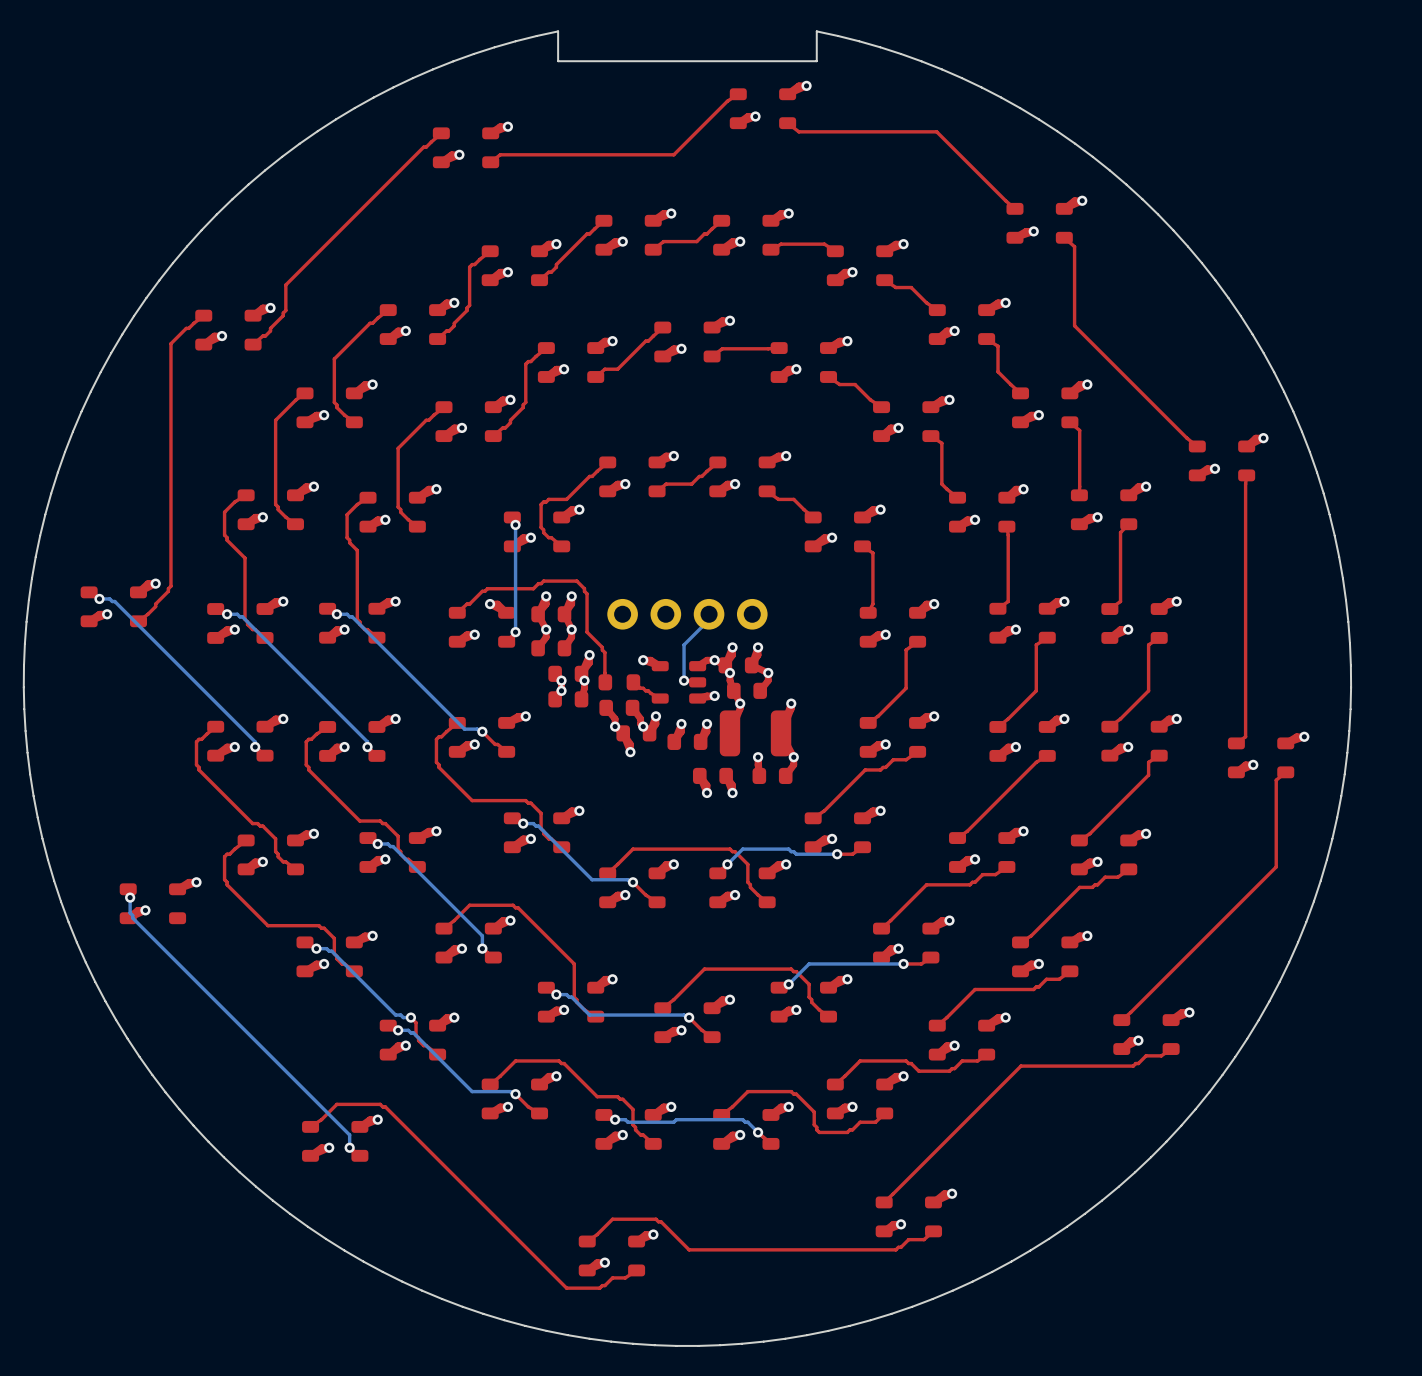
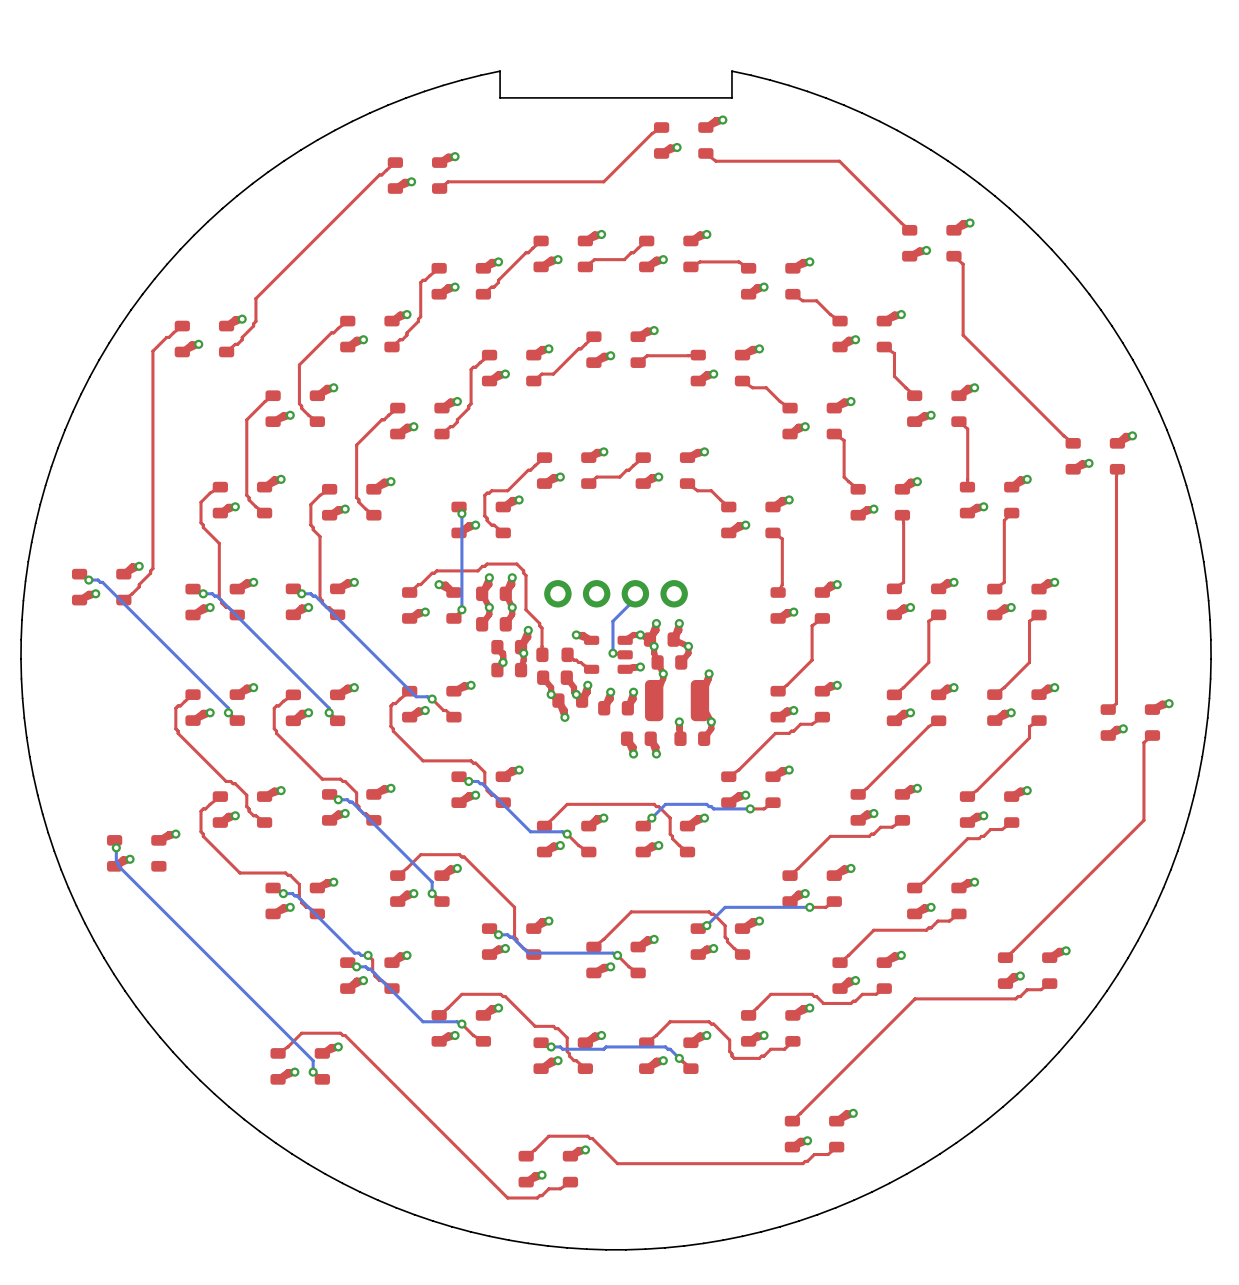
via: (561, 680) -> none

